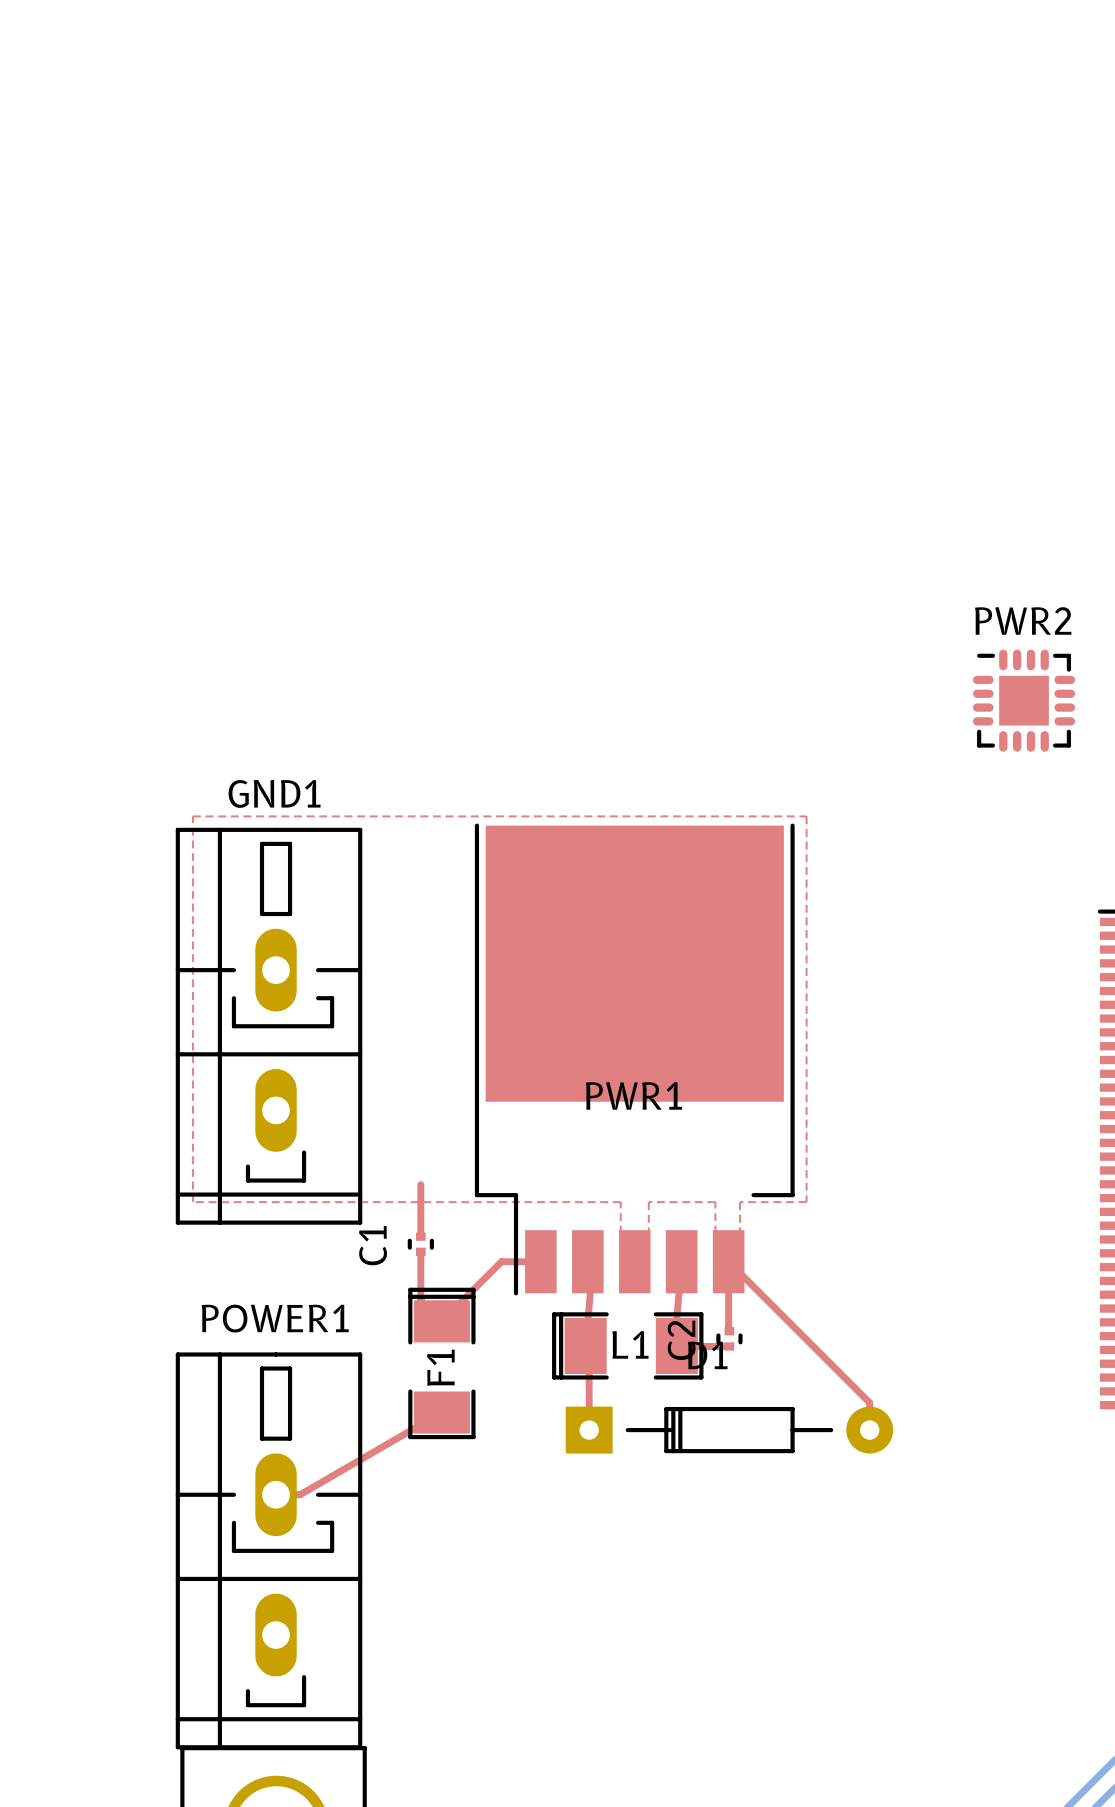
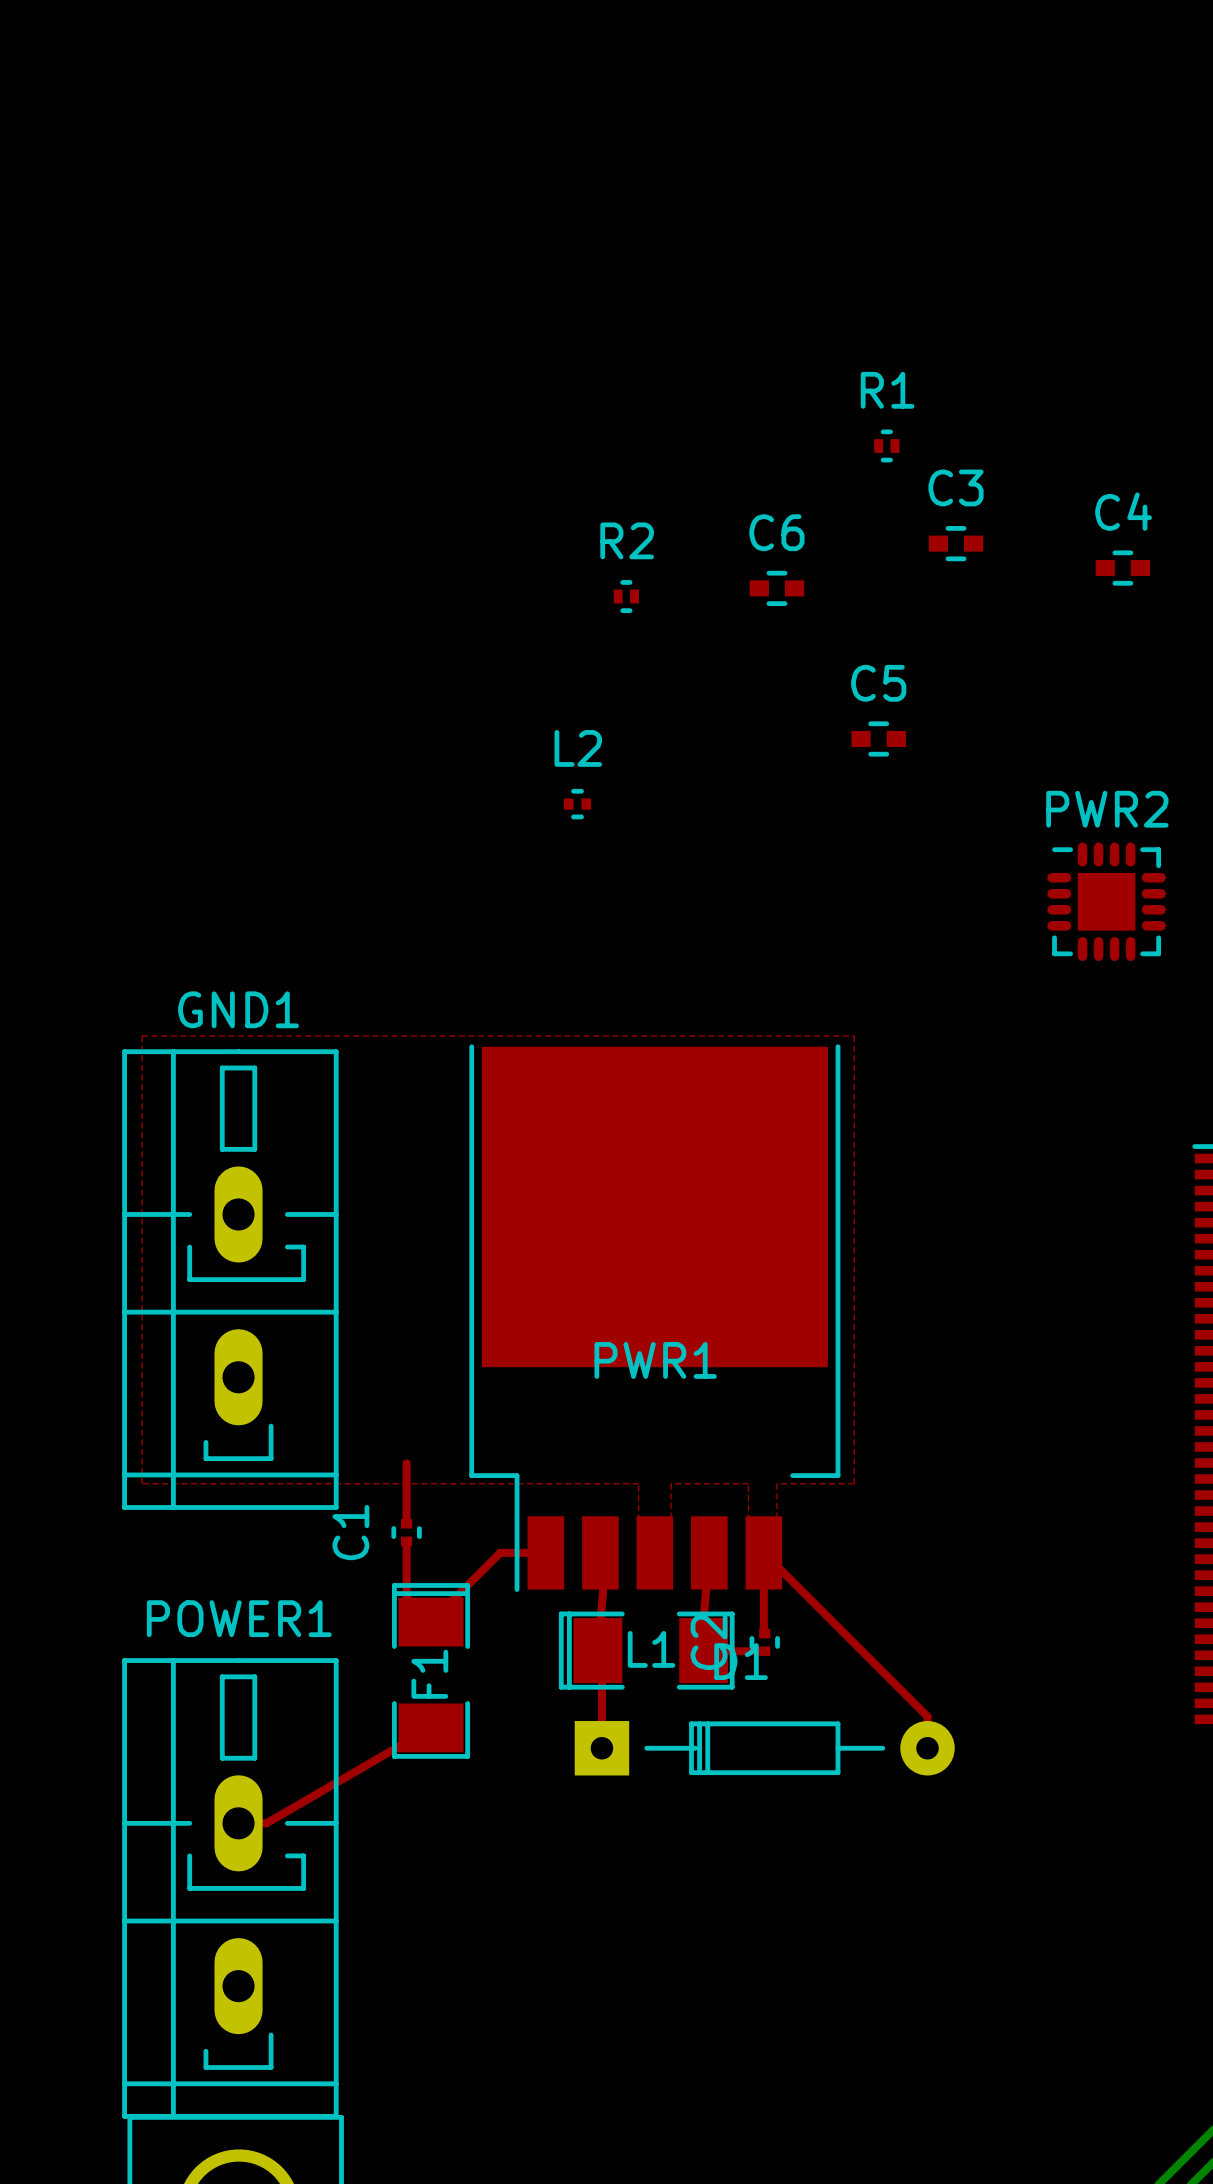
R1: none -> (886, 445)
C3: none -> (956, 543)
C4: none -> (1122, 568)
C6: none -> (776, 588)
R2: none -> (626, 596)
C5: none -> (878, 738)
L2: none -> (577, 804)

